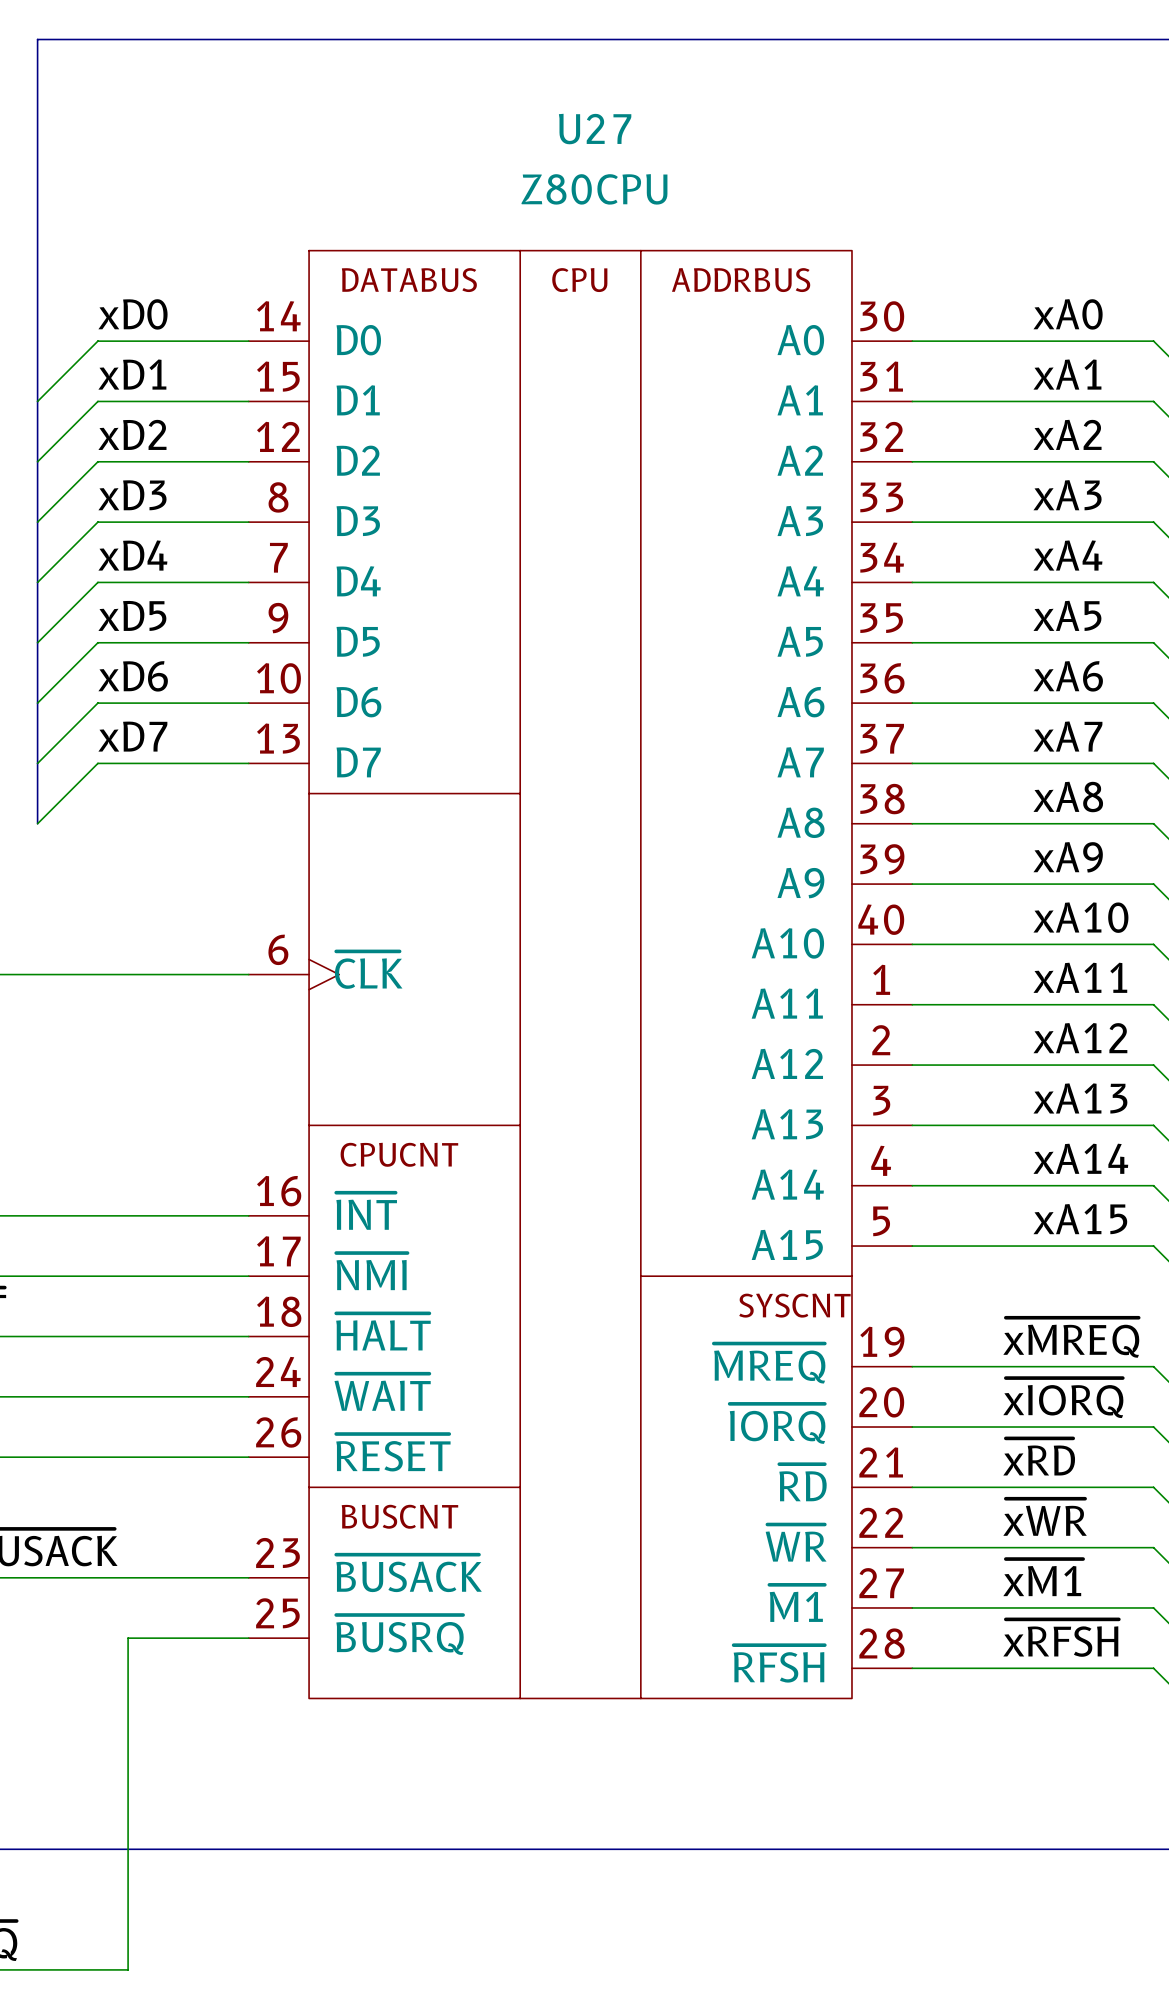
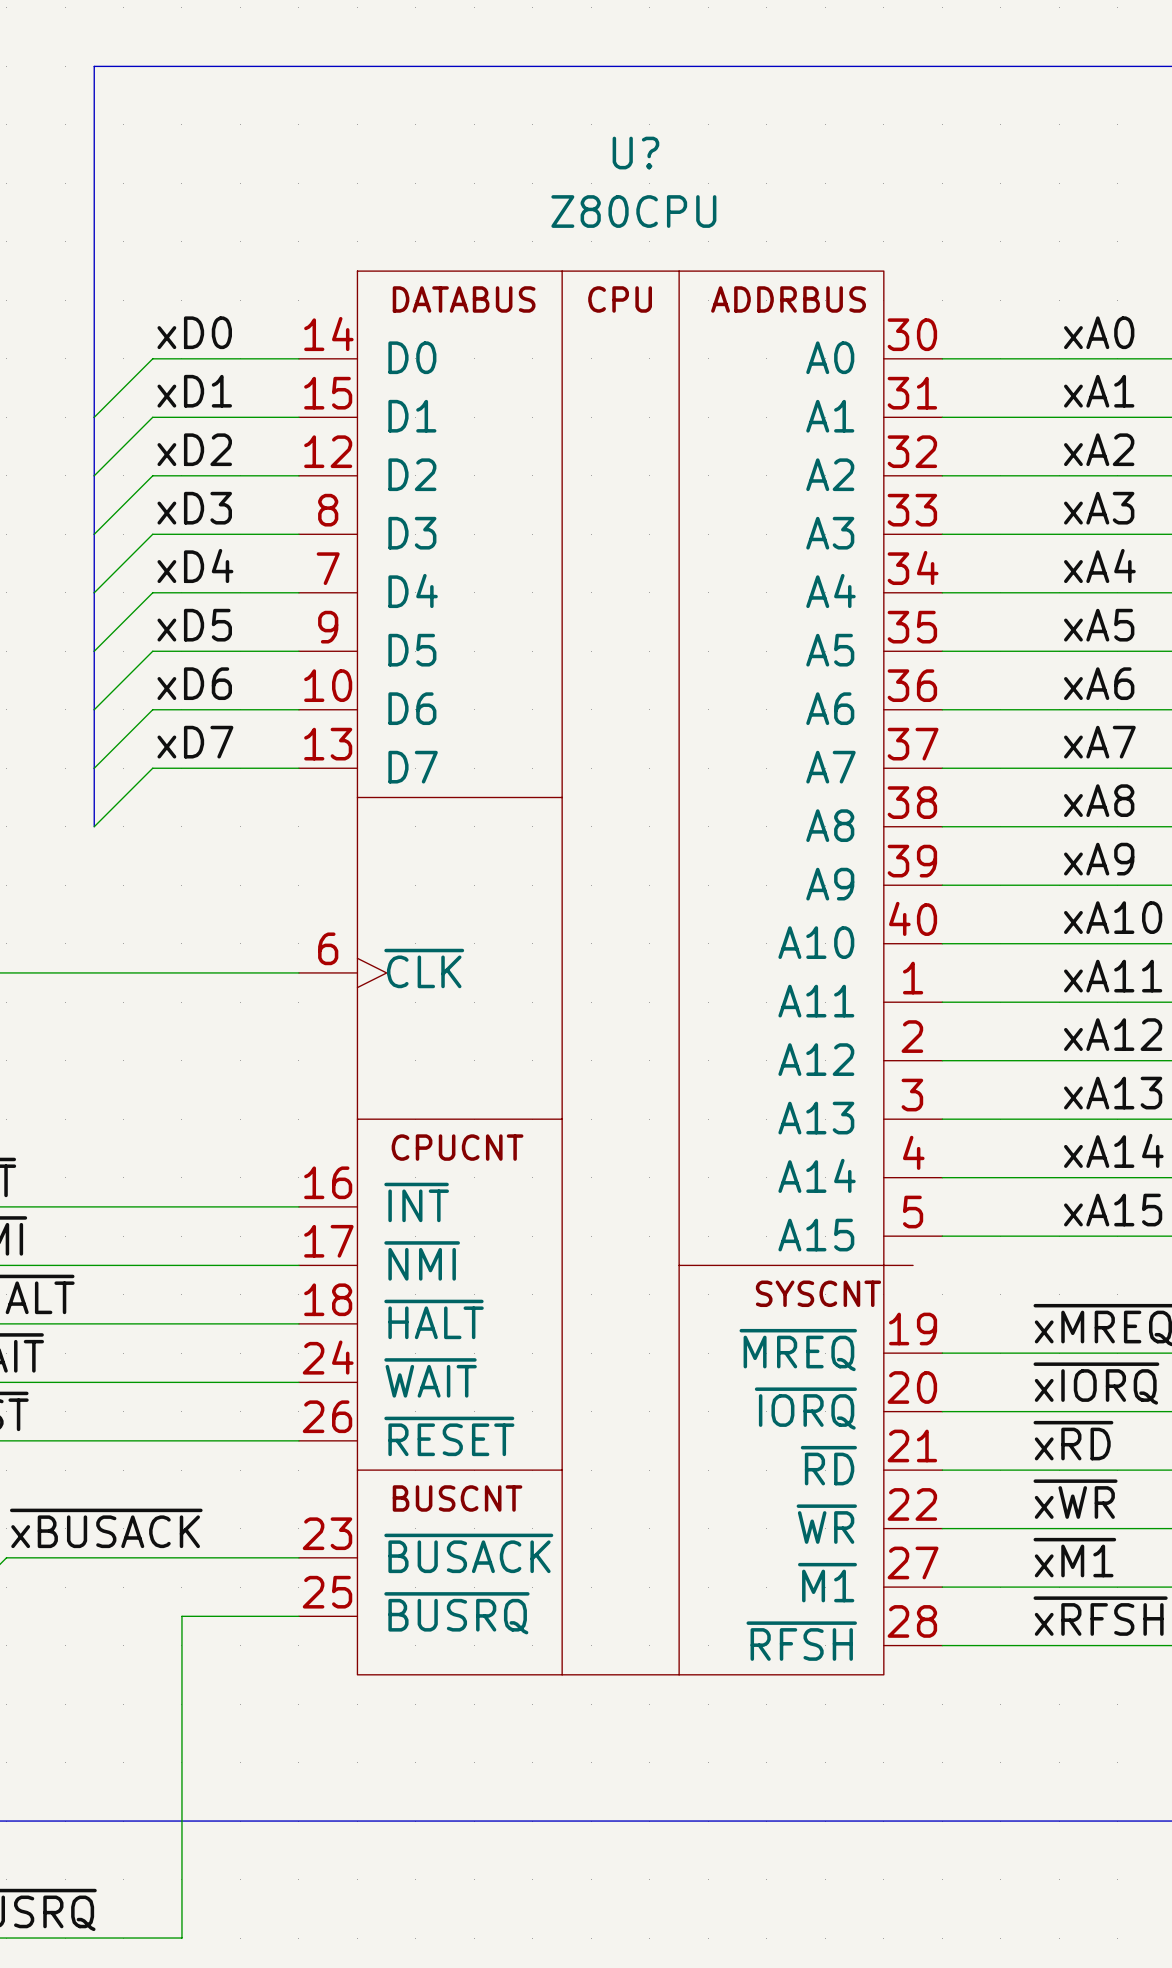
U27: Z80CPU (580, 974) -> none
U?: none -> Z80CPU (620, 972)

